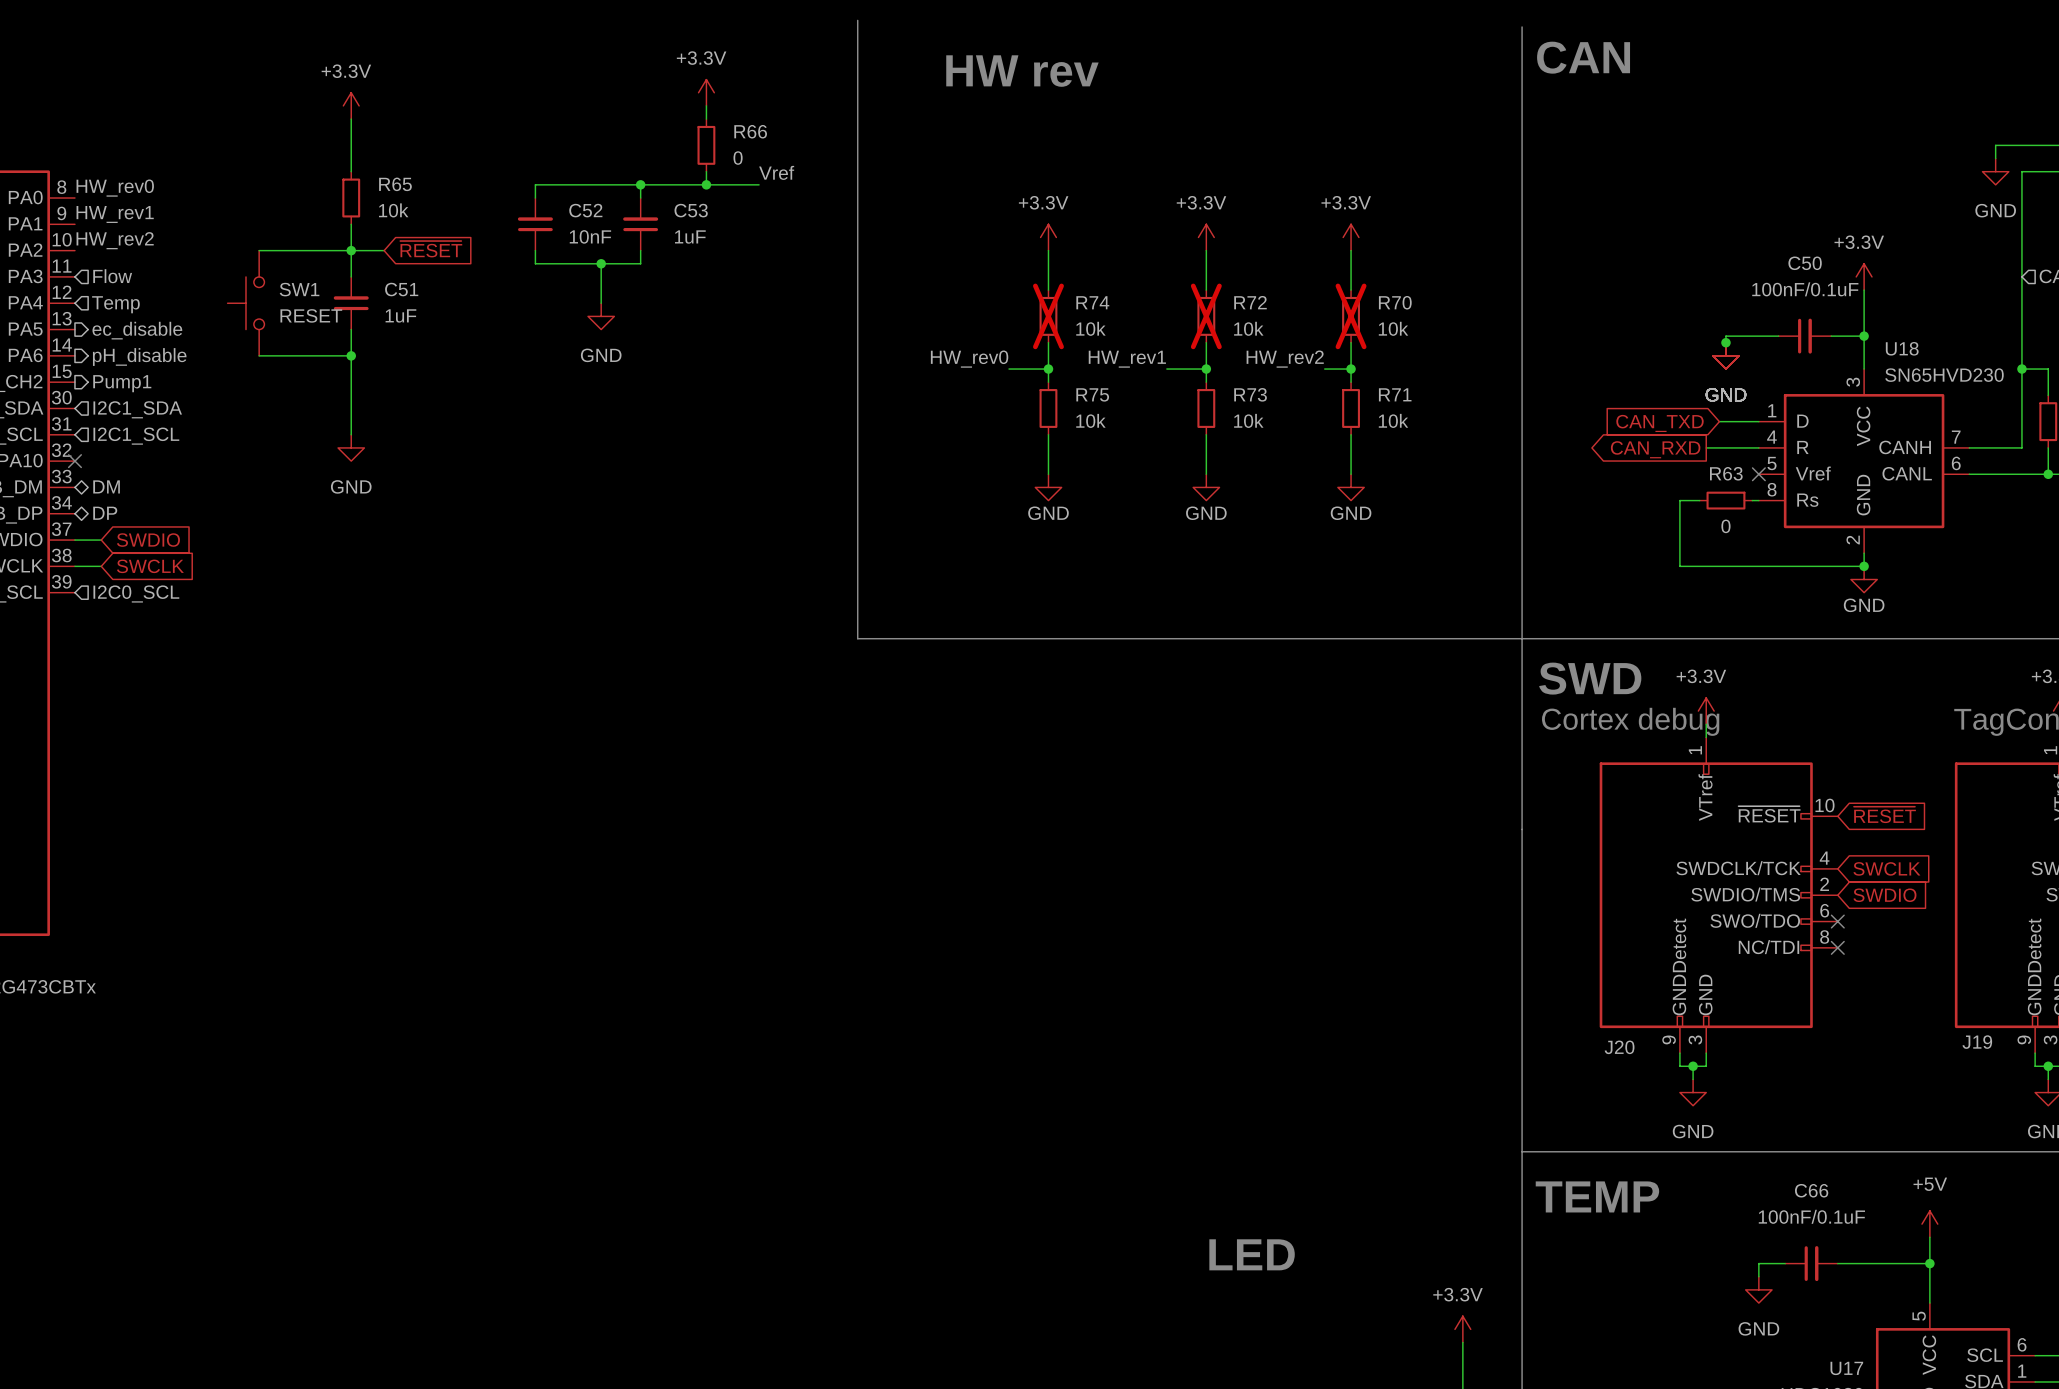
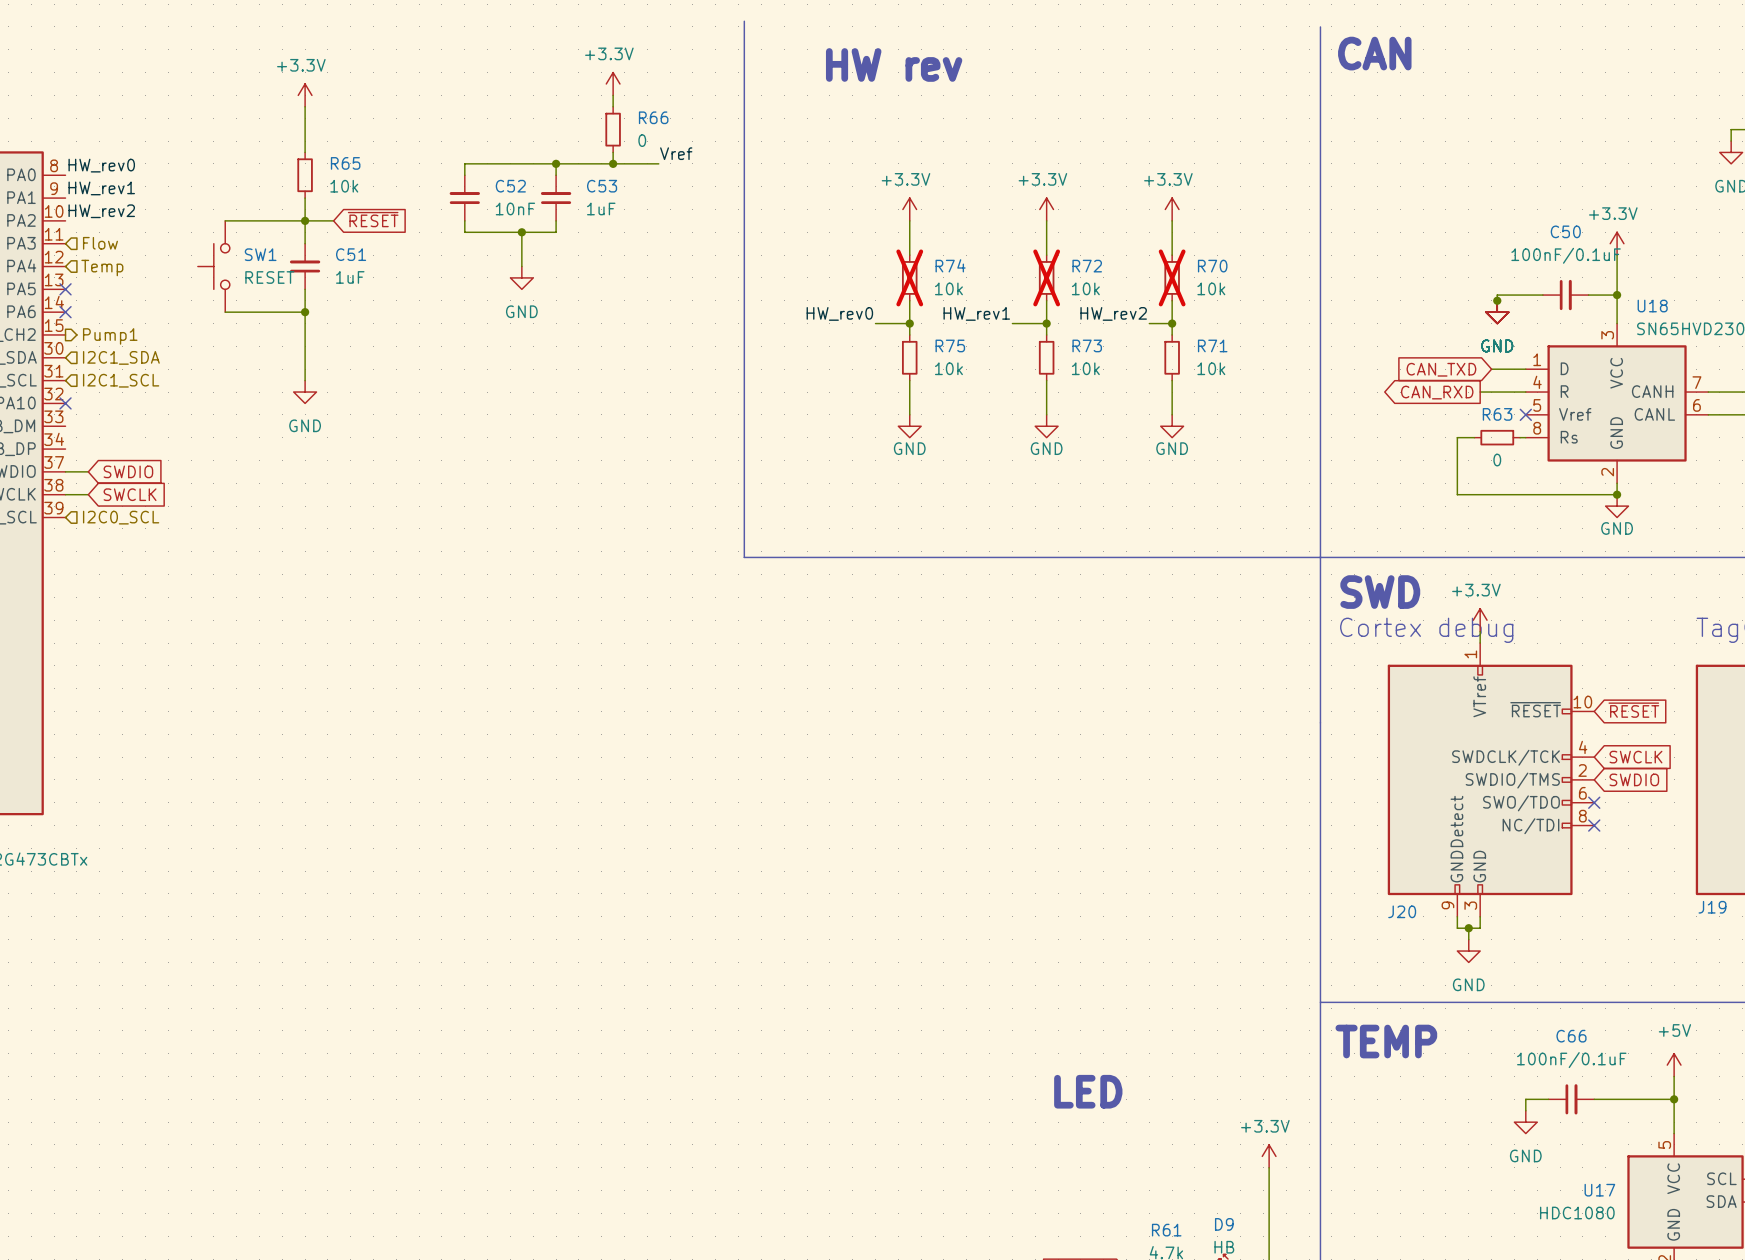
no-connect mark: none -> (65, 289)
hierarchical label: ec_disable (137, 330) -> none
no-connect mark: none -> (65, 312)
hierarchical label: pH_disable (139, 357) -> none
hierarchical label: DM (106, 486) -> none
hierarchical label: DP (105, 513) -> none

